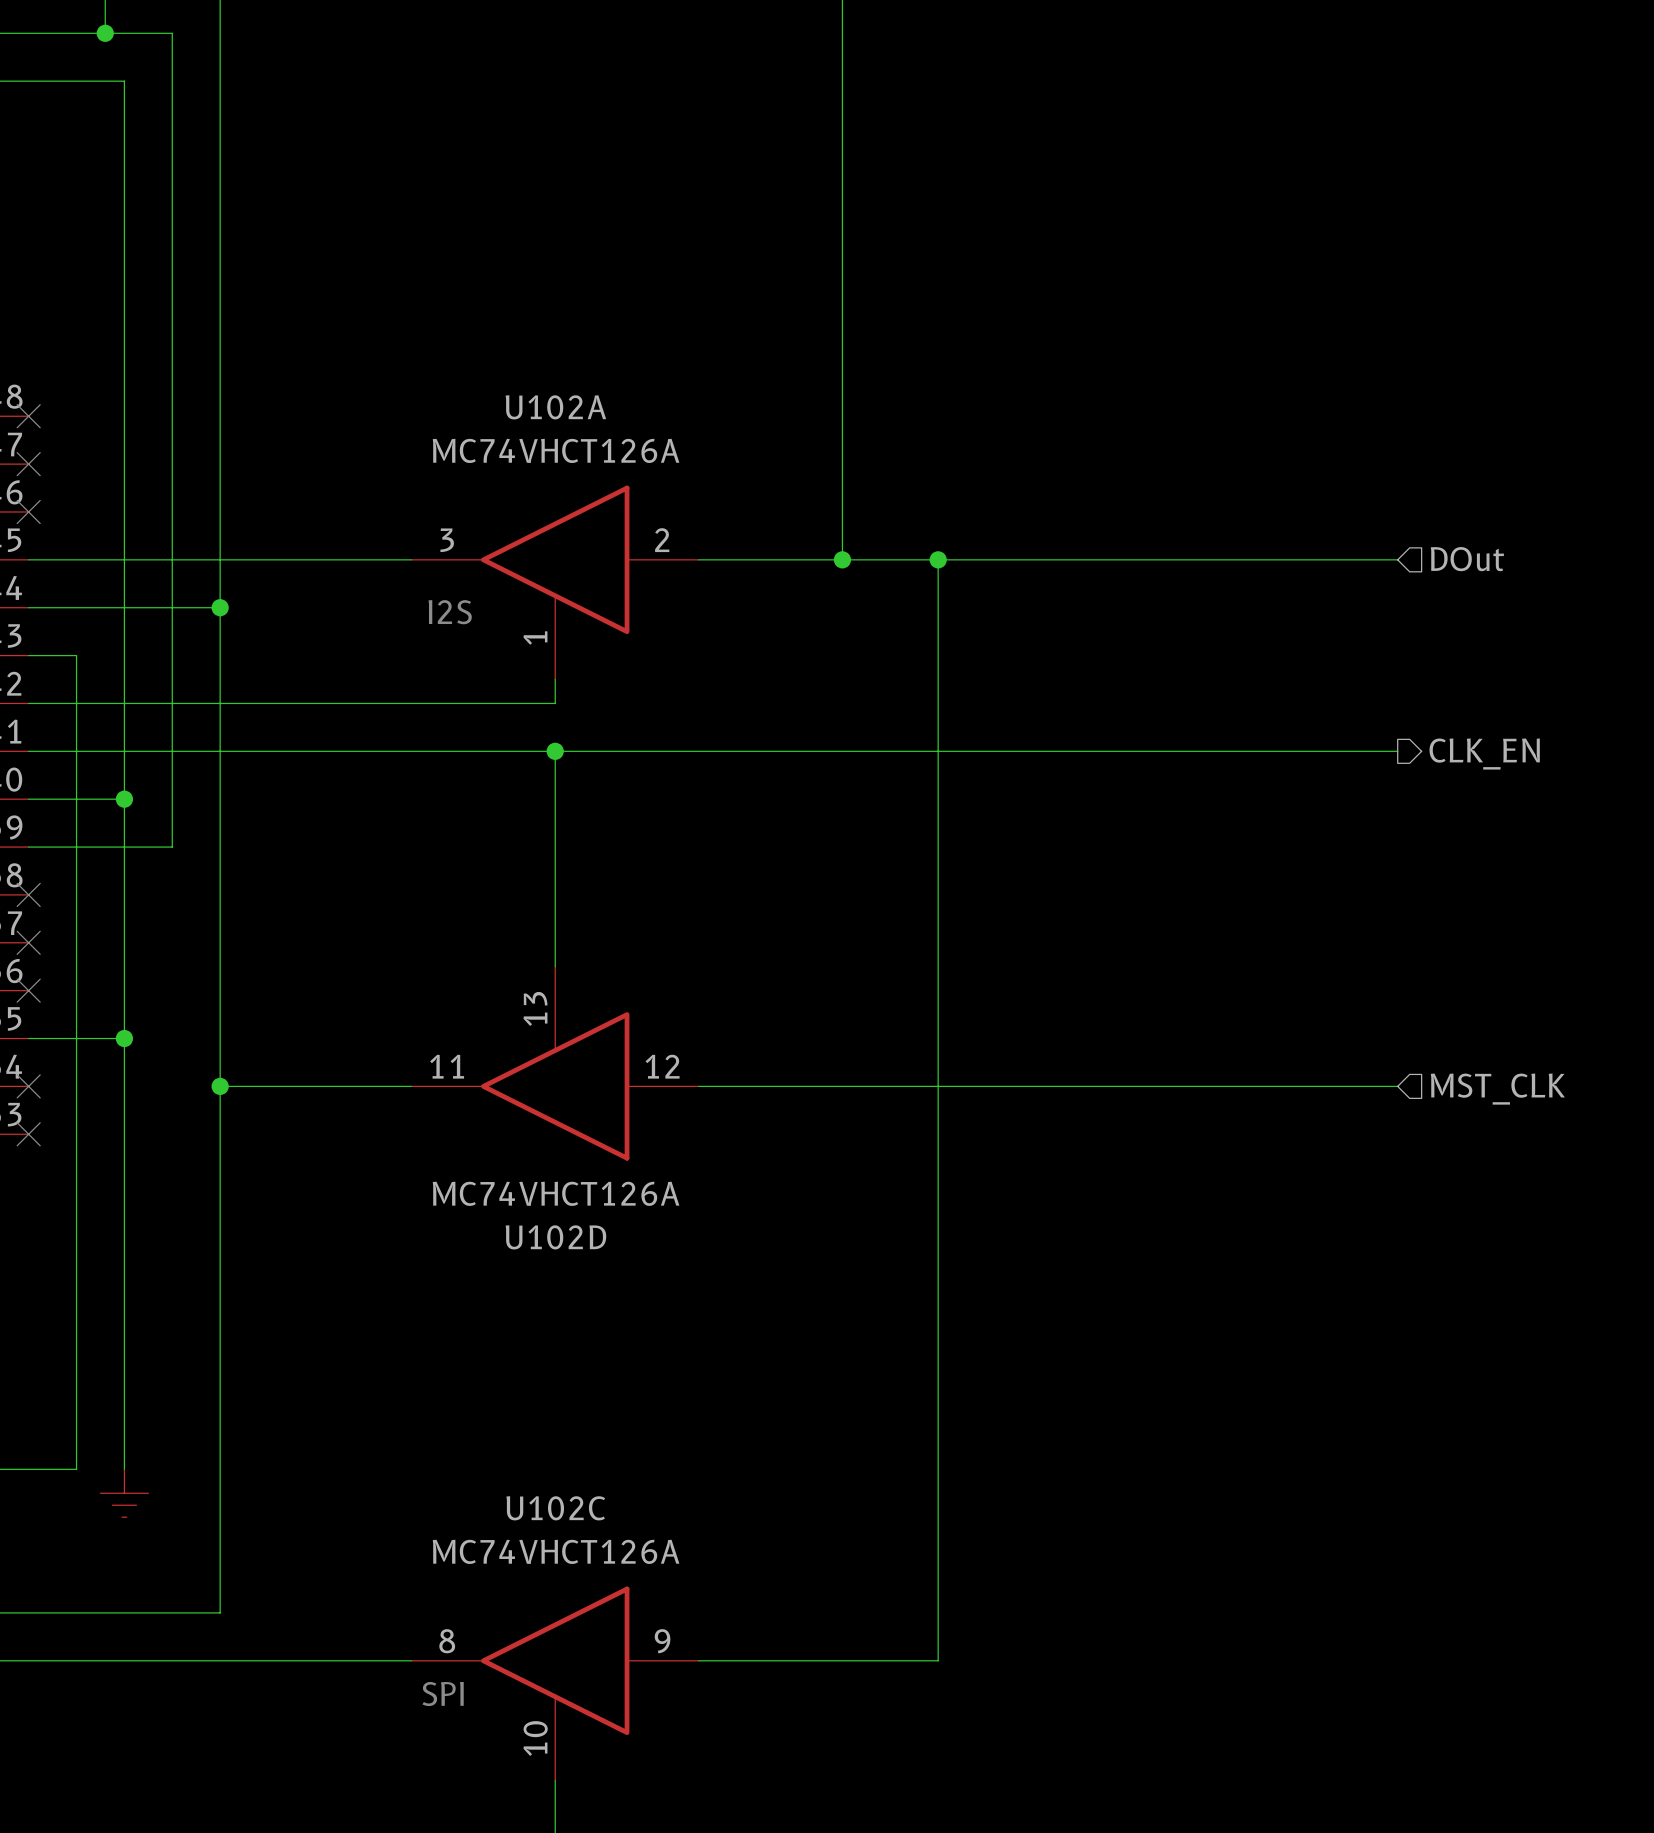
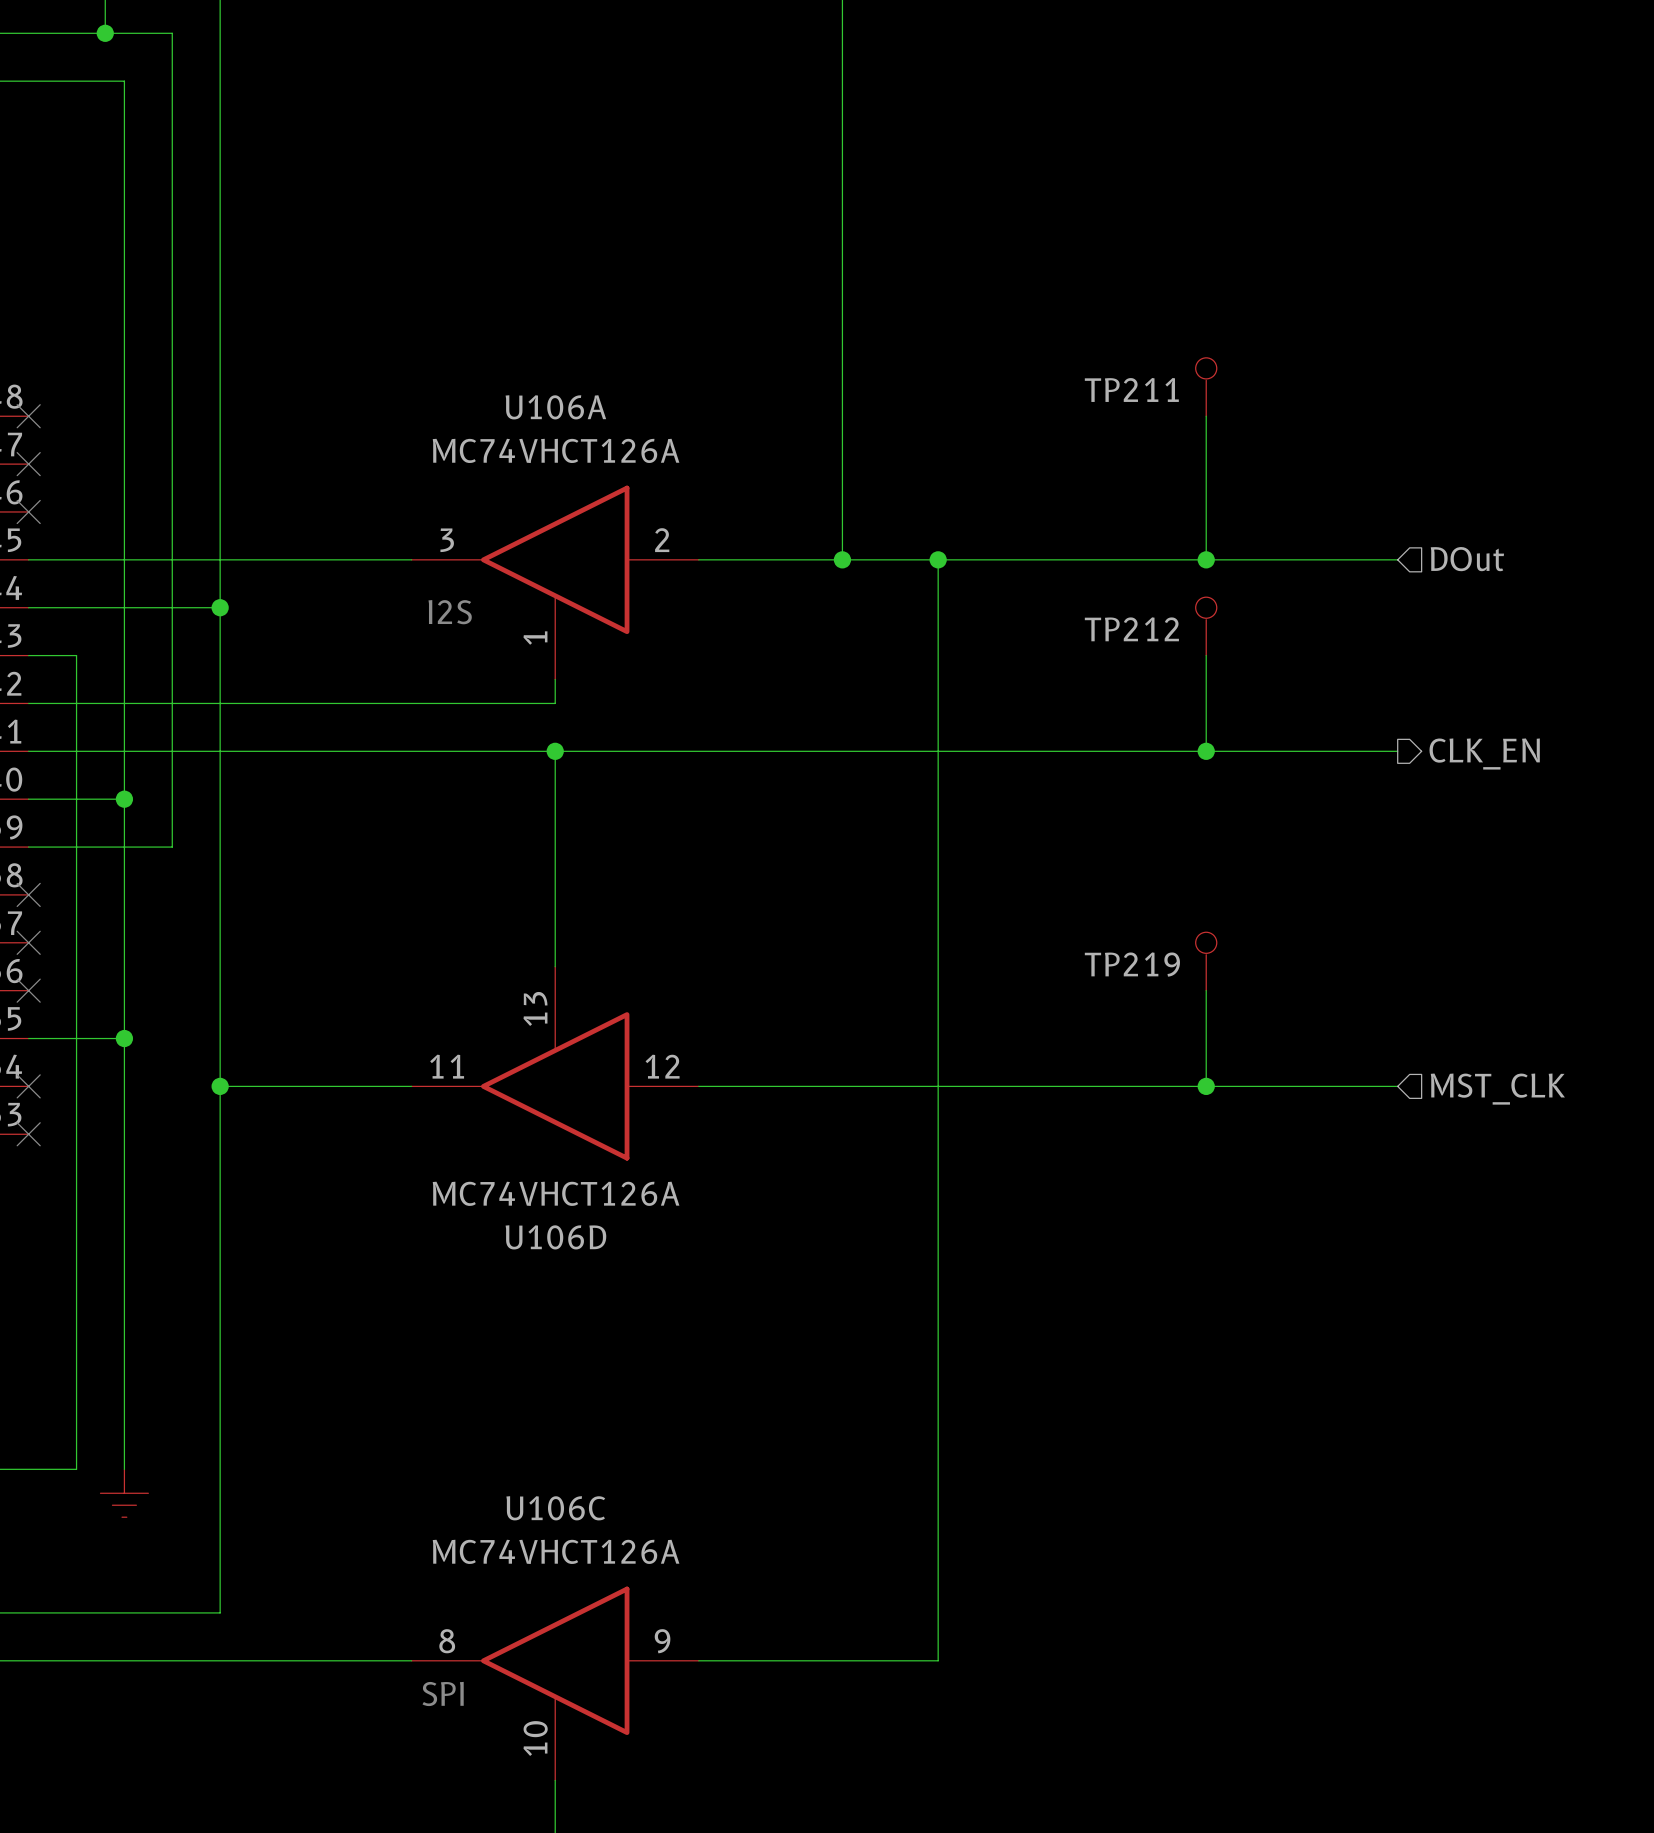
TP211: none -> (1206, 387)
U102A name: U102A (555, 407) -> U106A (555, 407)
wire: none -> (1206, 416) (1206, 559)
junction: none -> (1206, 559)
TP212: none -> (1206, 626)
wire: none -> (1206, 655) (1206, 751)
junction: none -> (1206, 751)
TP219: none -> (1206, 961)
wire: none -> (1206, 990) (1206, 1086)
junction: none -> (1206, 1086)
U102D name: U102D (555, 1237) -> U106D (555, 1237)
U102C name: U102C (555, 1508) -> U106C (555, 1508)

